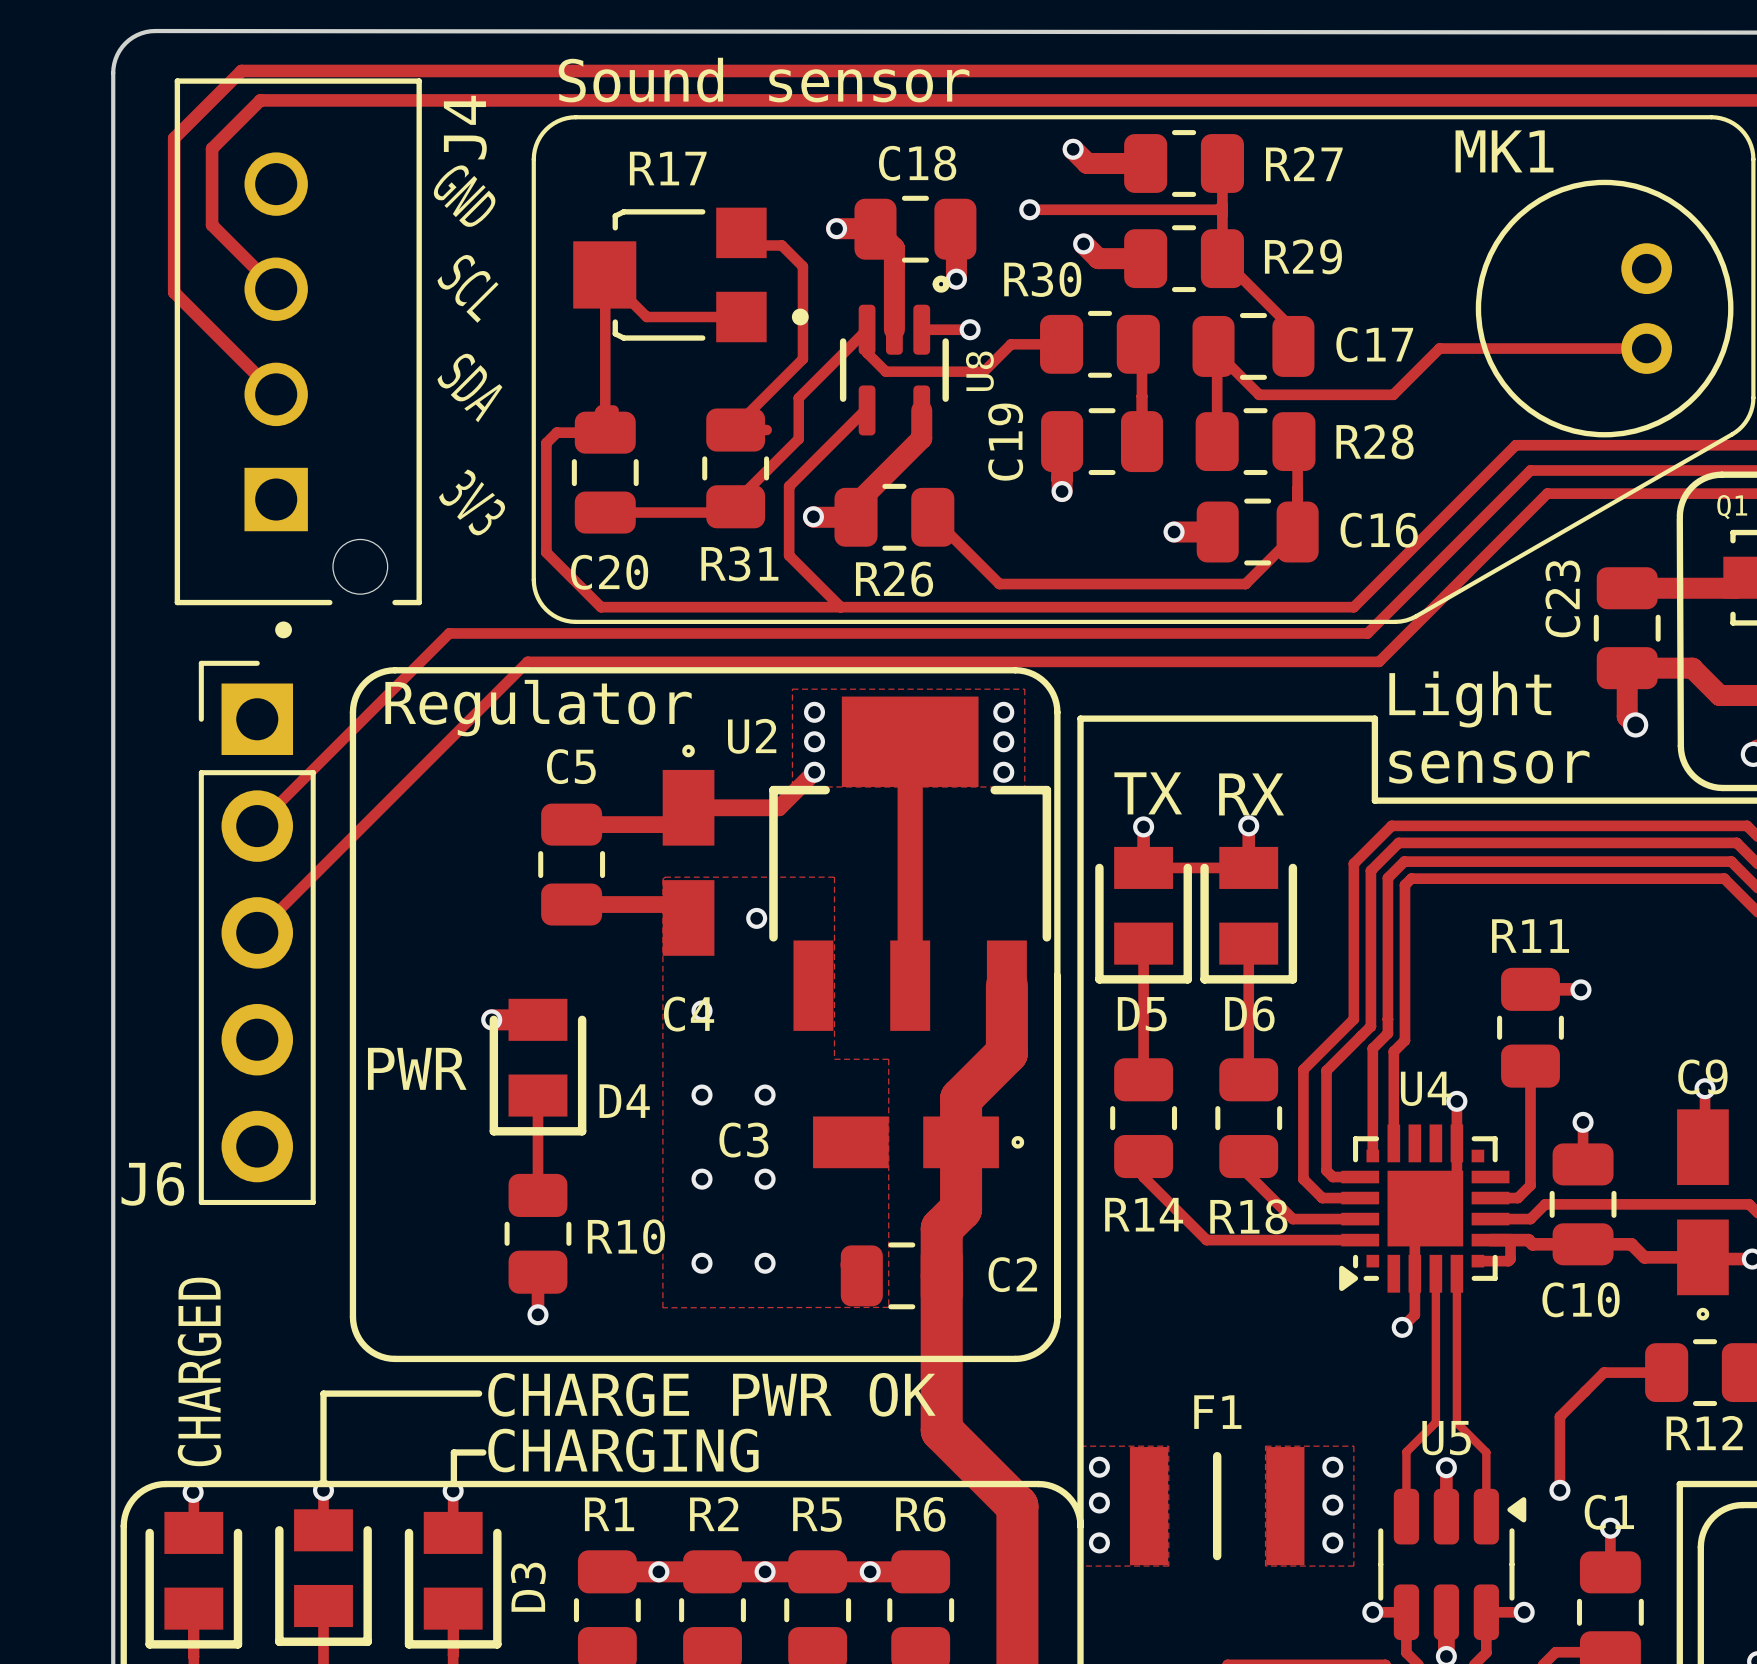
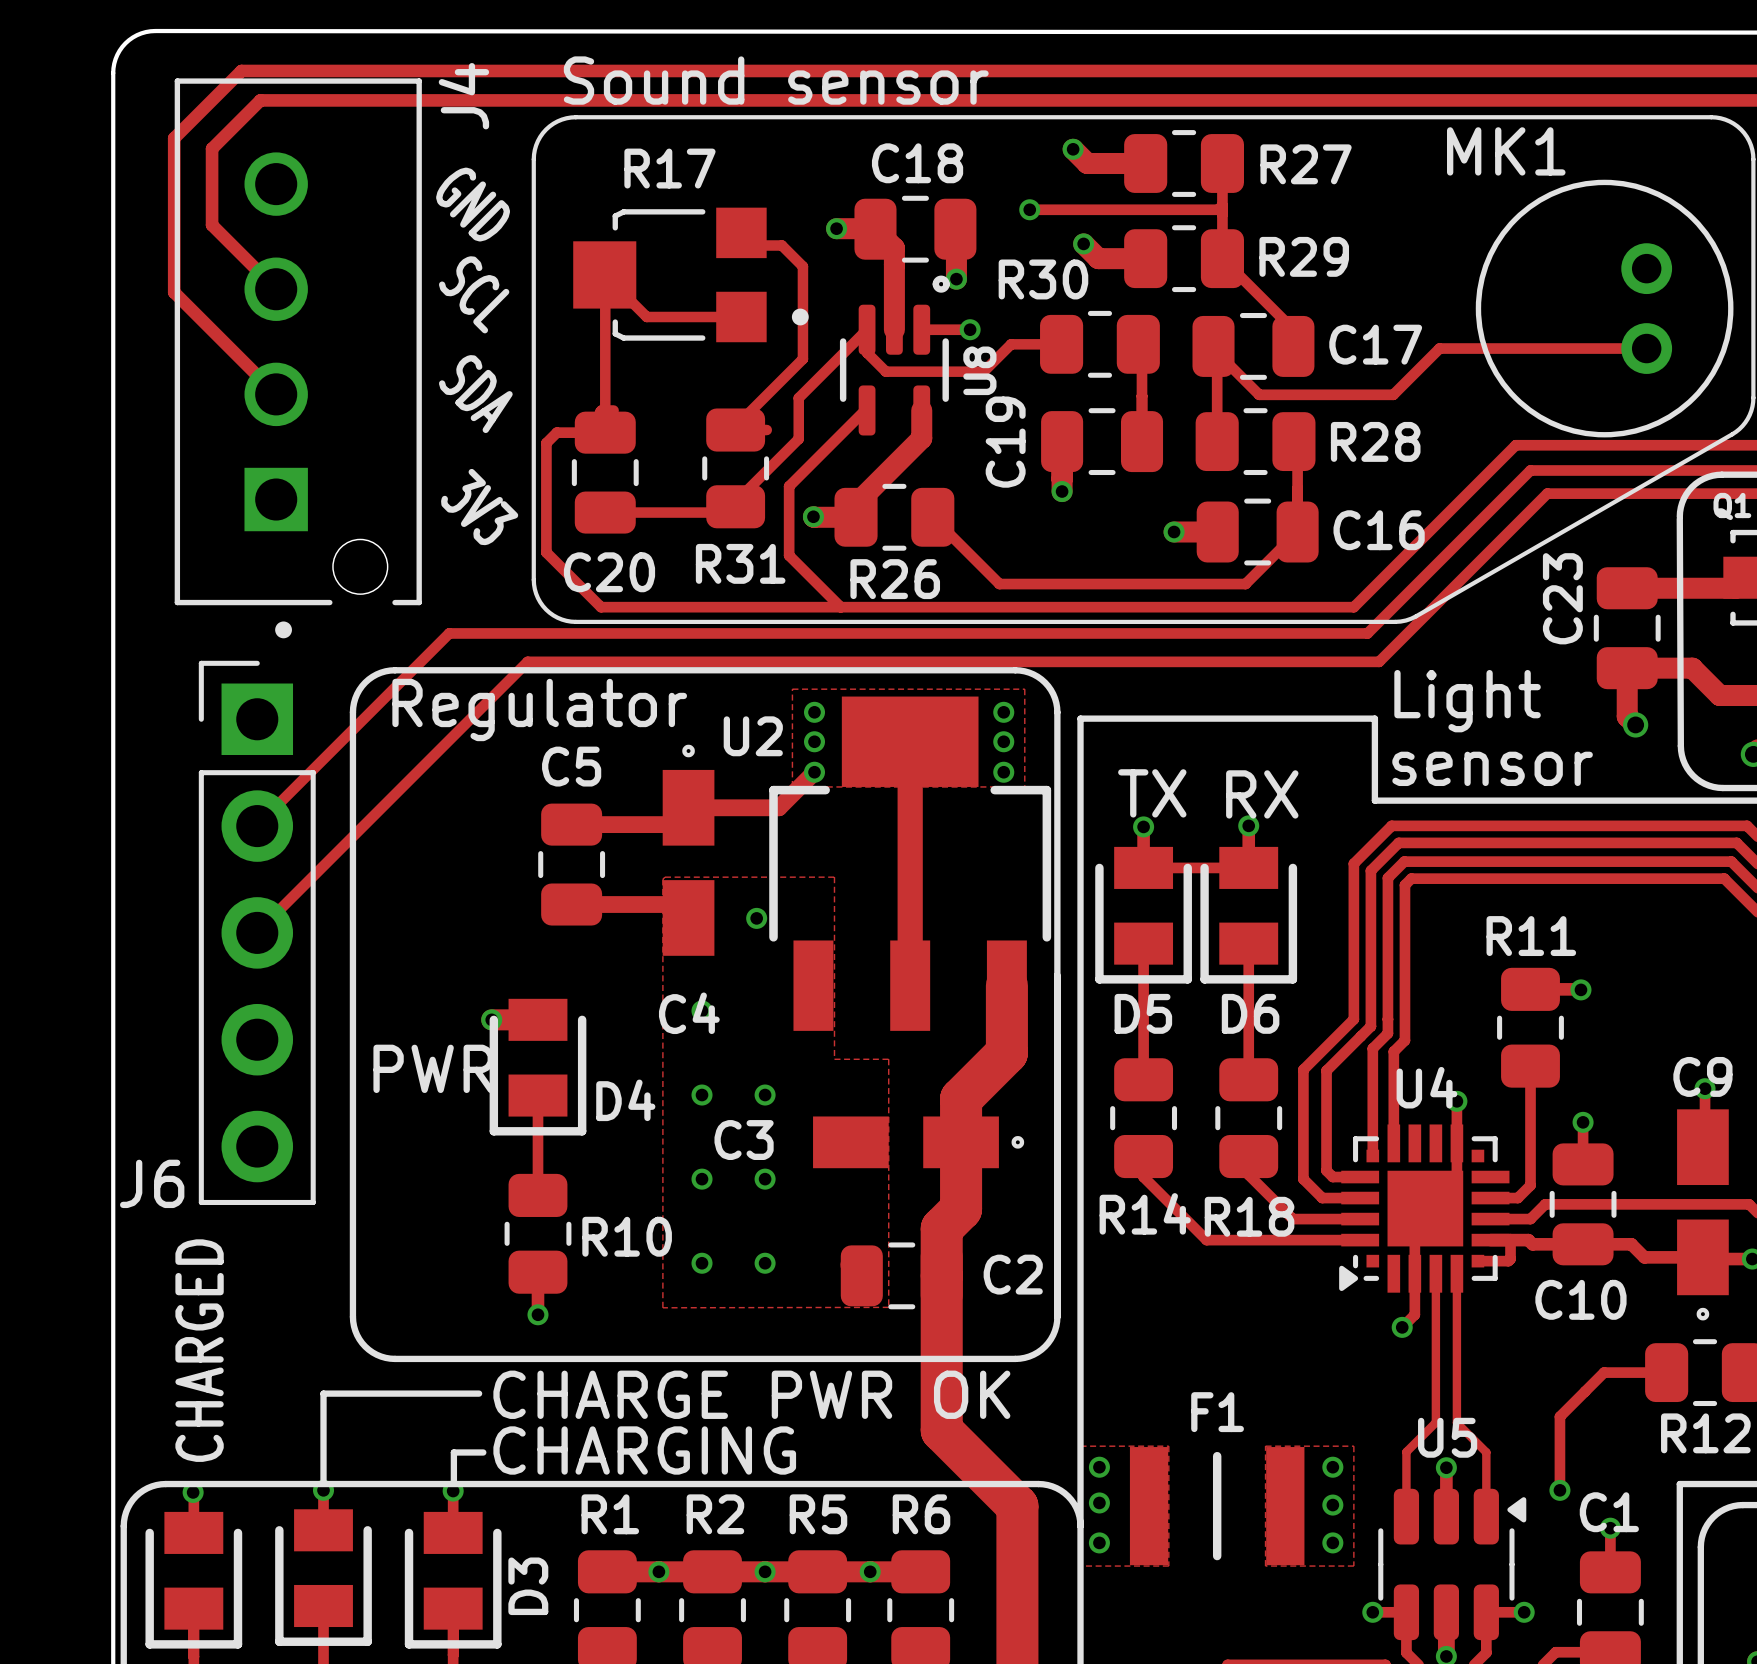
J4 name position: J4 (465, 127) -> J4 (463, 96)

